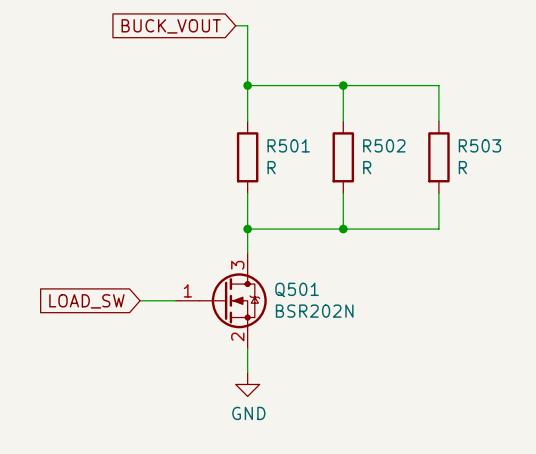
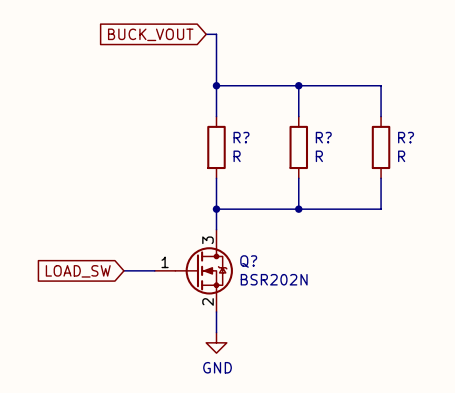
R501 name: R501 (288, 145) -> R? (241, 137)
R502 name: R502 (384, 145) -> R? (323, 137)
R503 name: R503 (479, 145) -> R? (406, 137)
Q501 name: Q501 (297, 289) -> Q? (248, 261)

